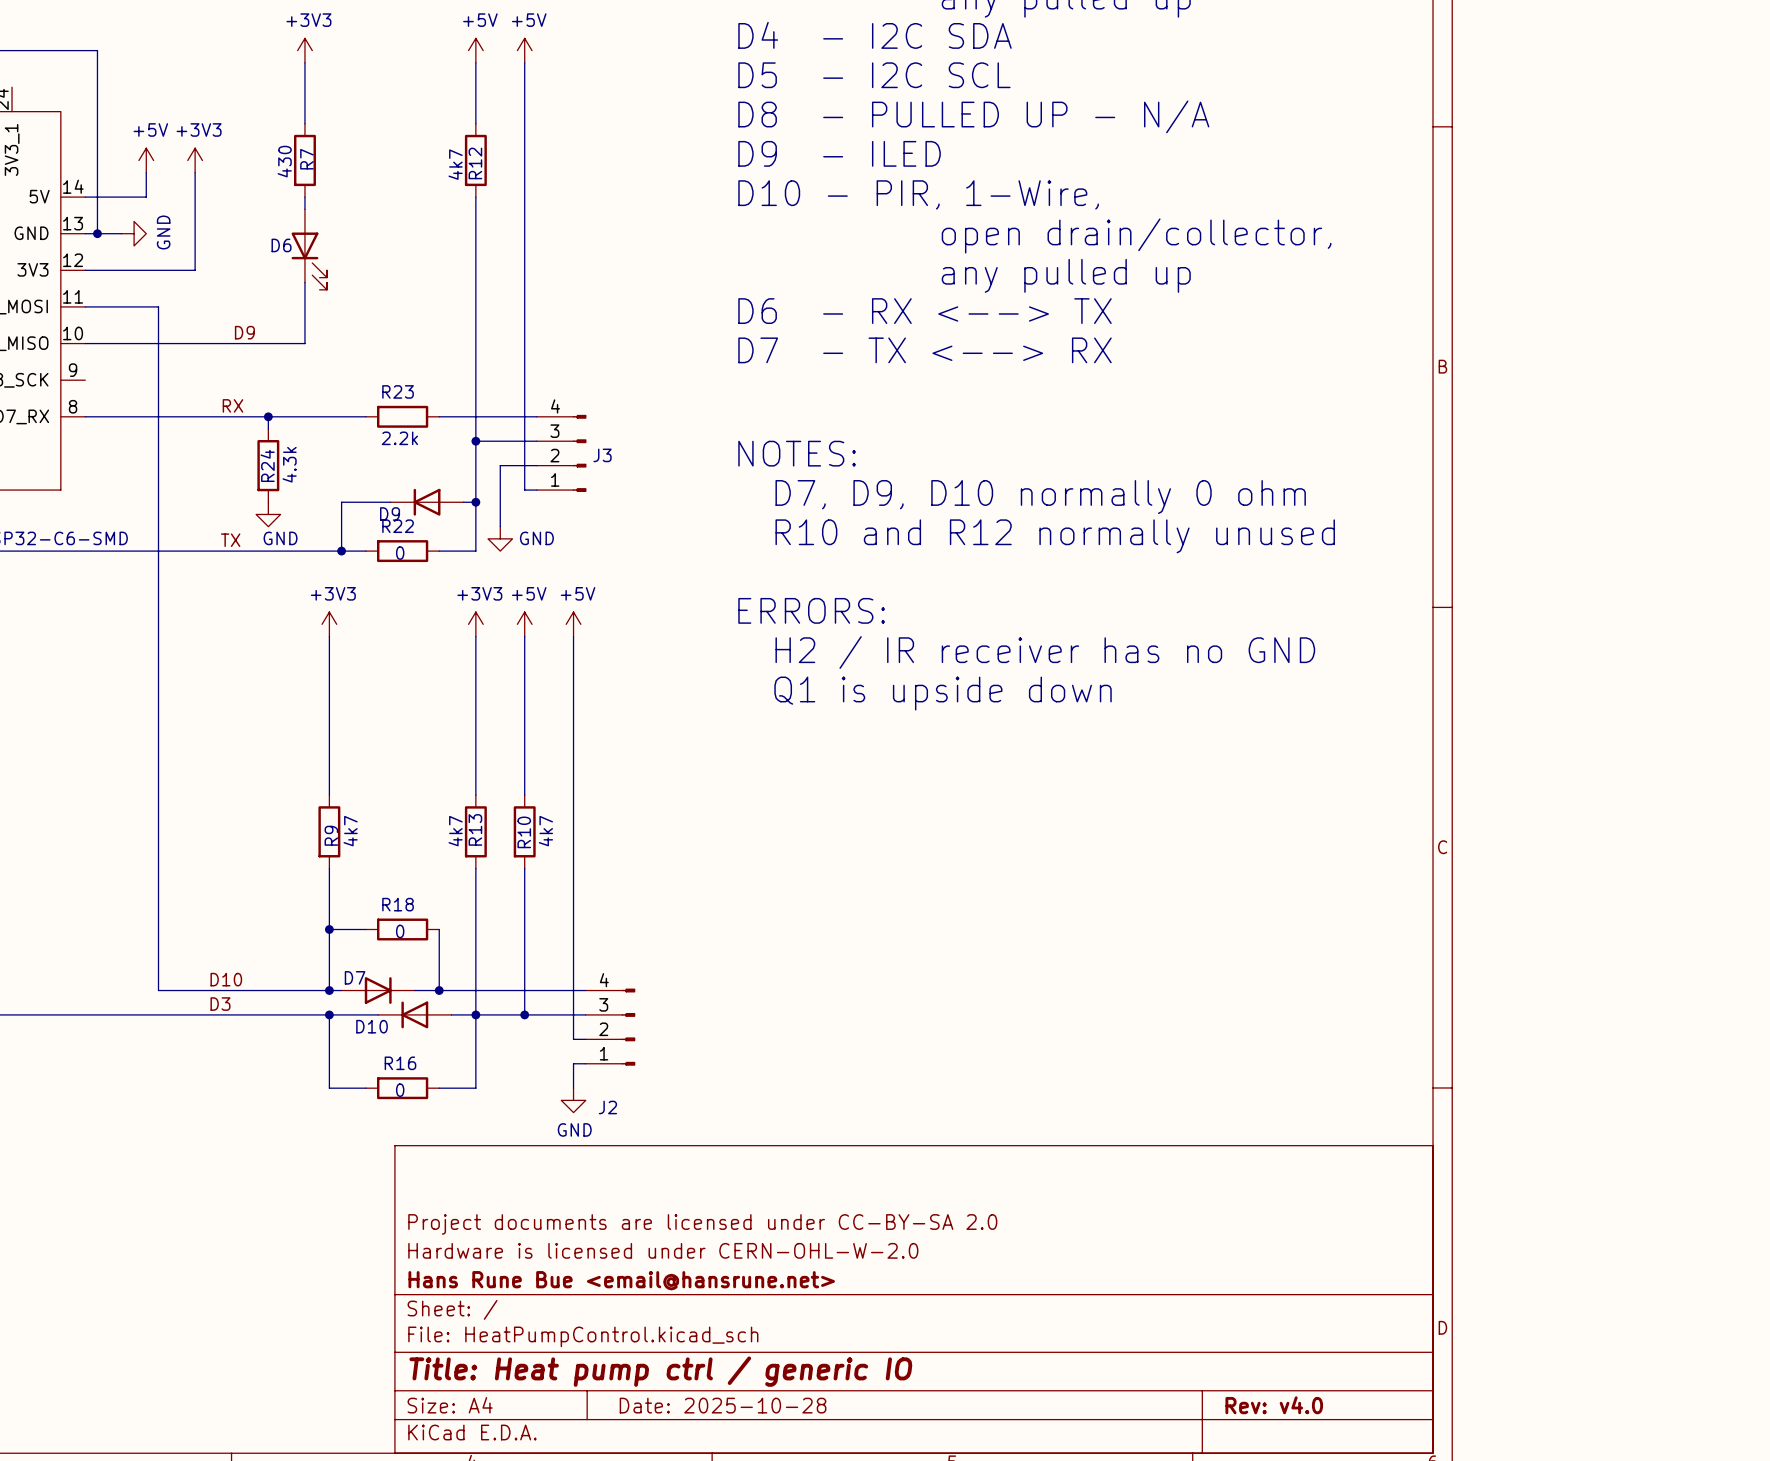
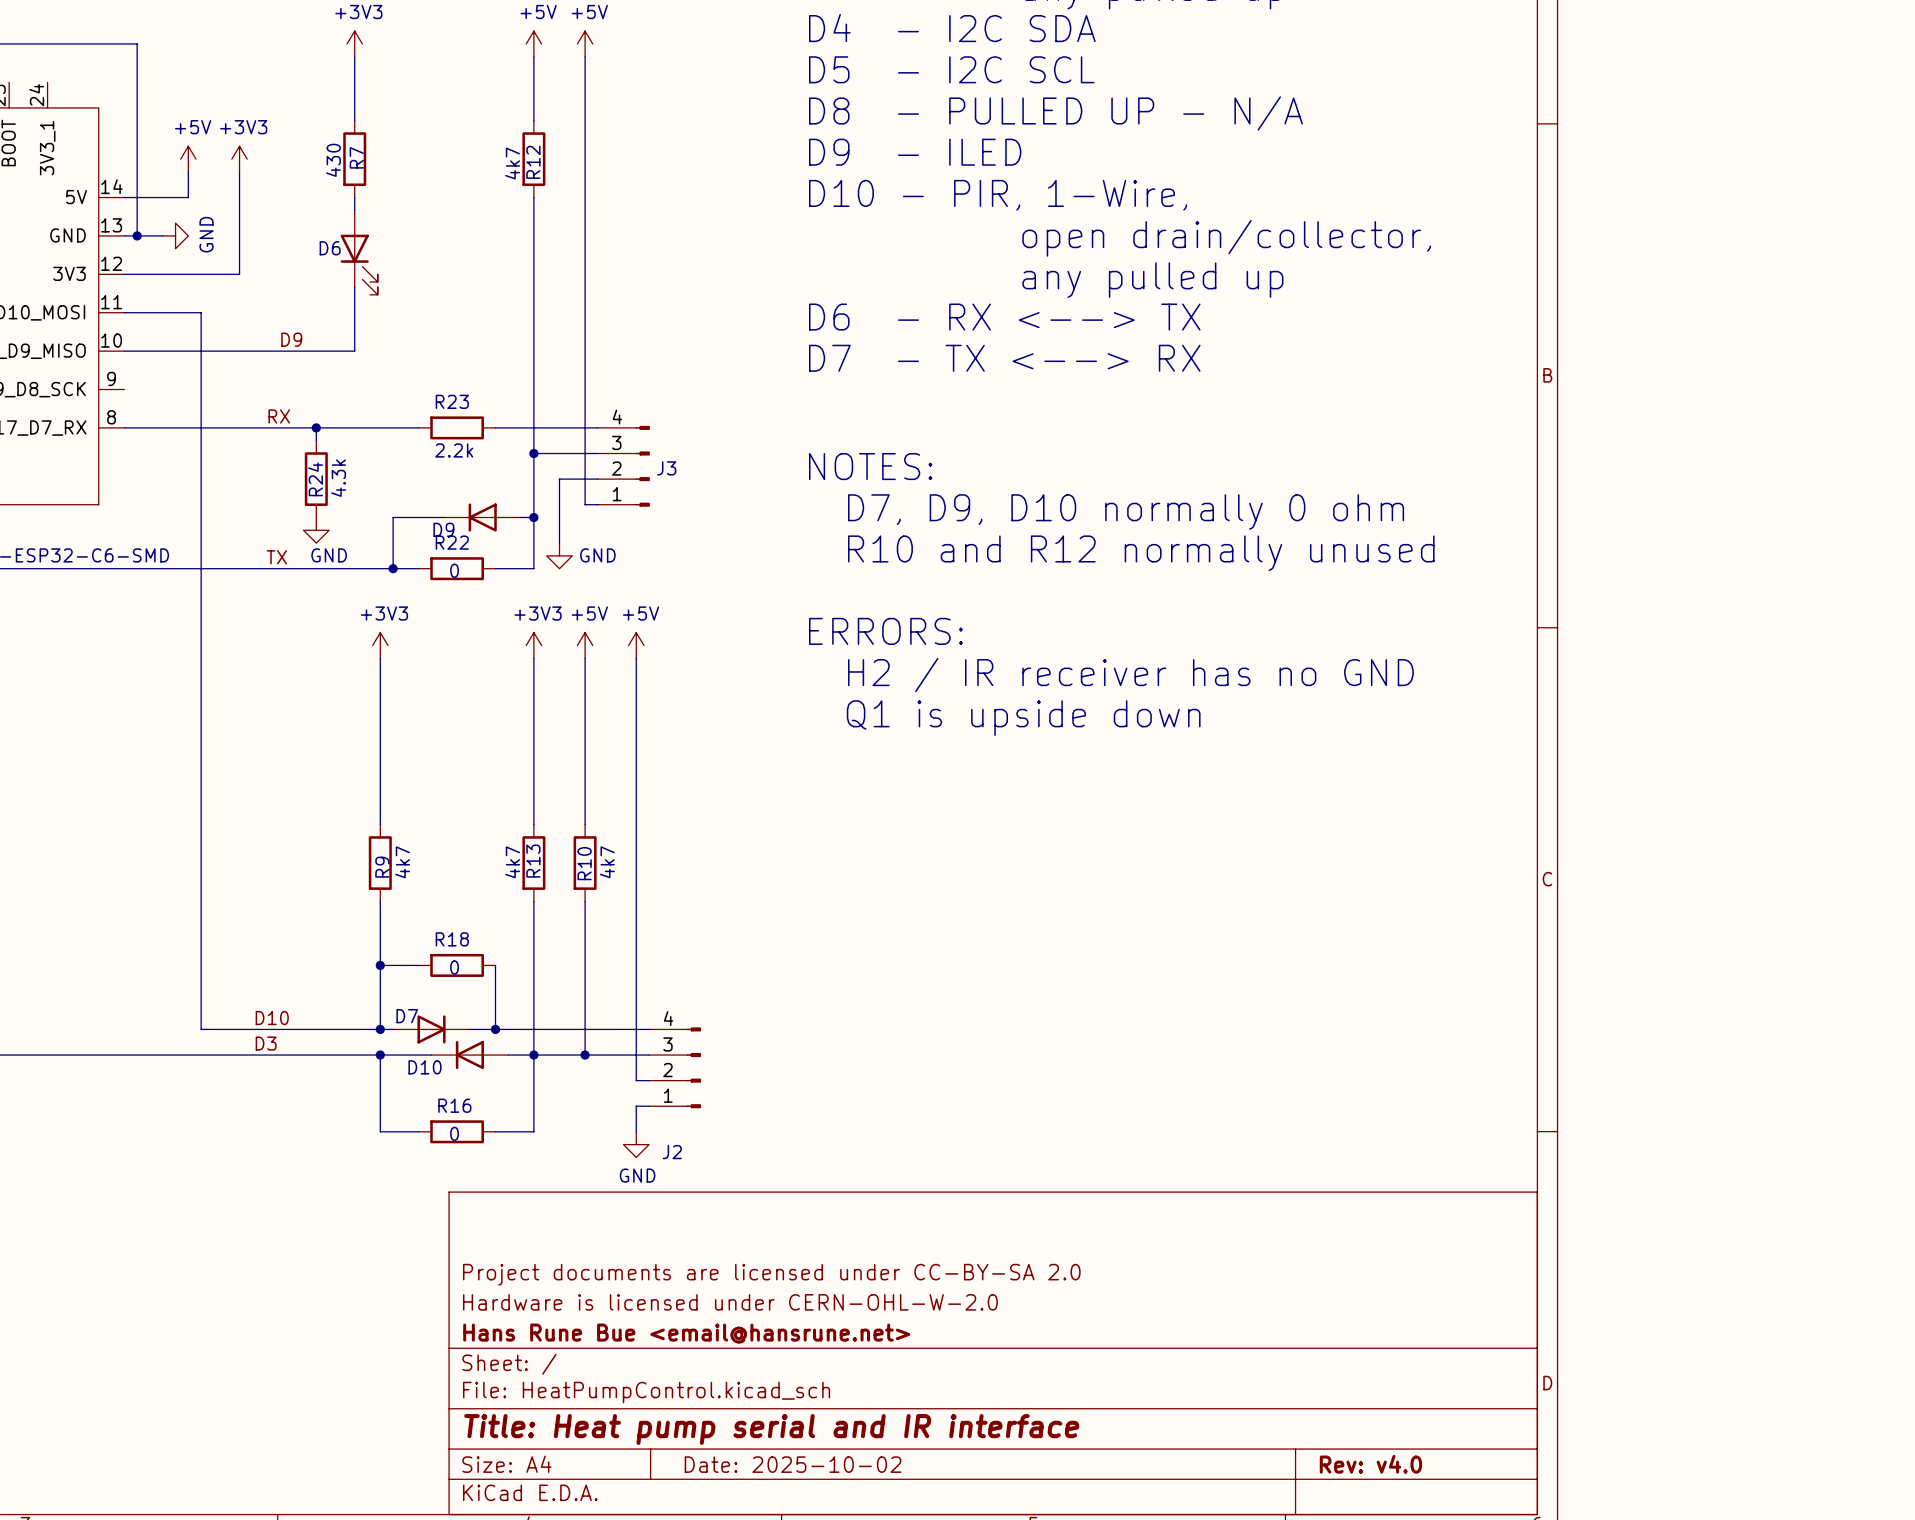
title block: Title: Heat pump ctrl / generic IO (660, 1371) -> Title: Heat pump serial and IR interface (771, 1429)
title block: Date: 2025-10-28 (723, 1405) -> Date: 2025-10-02 (793, 1464)

